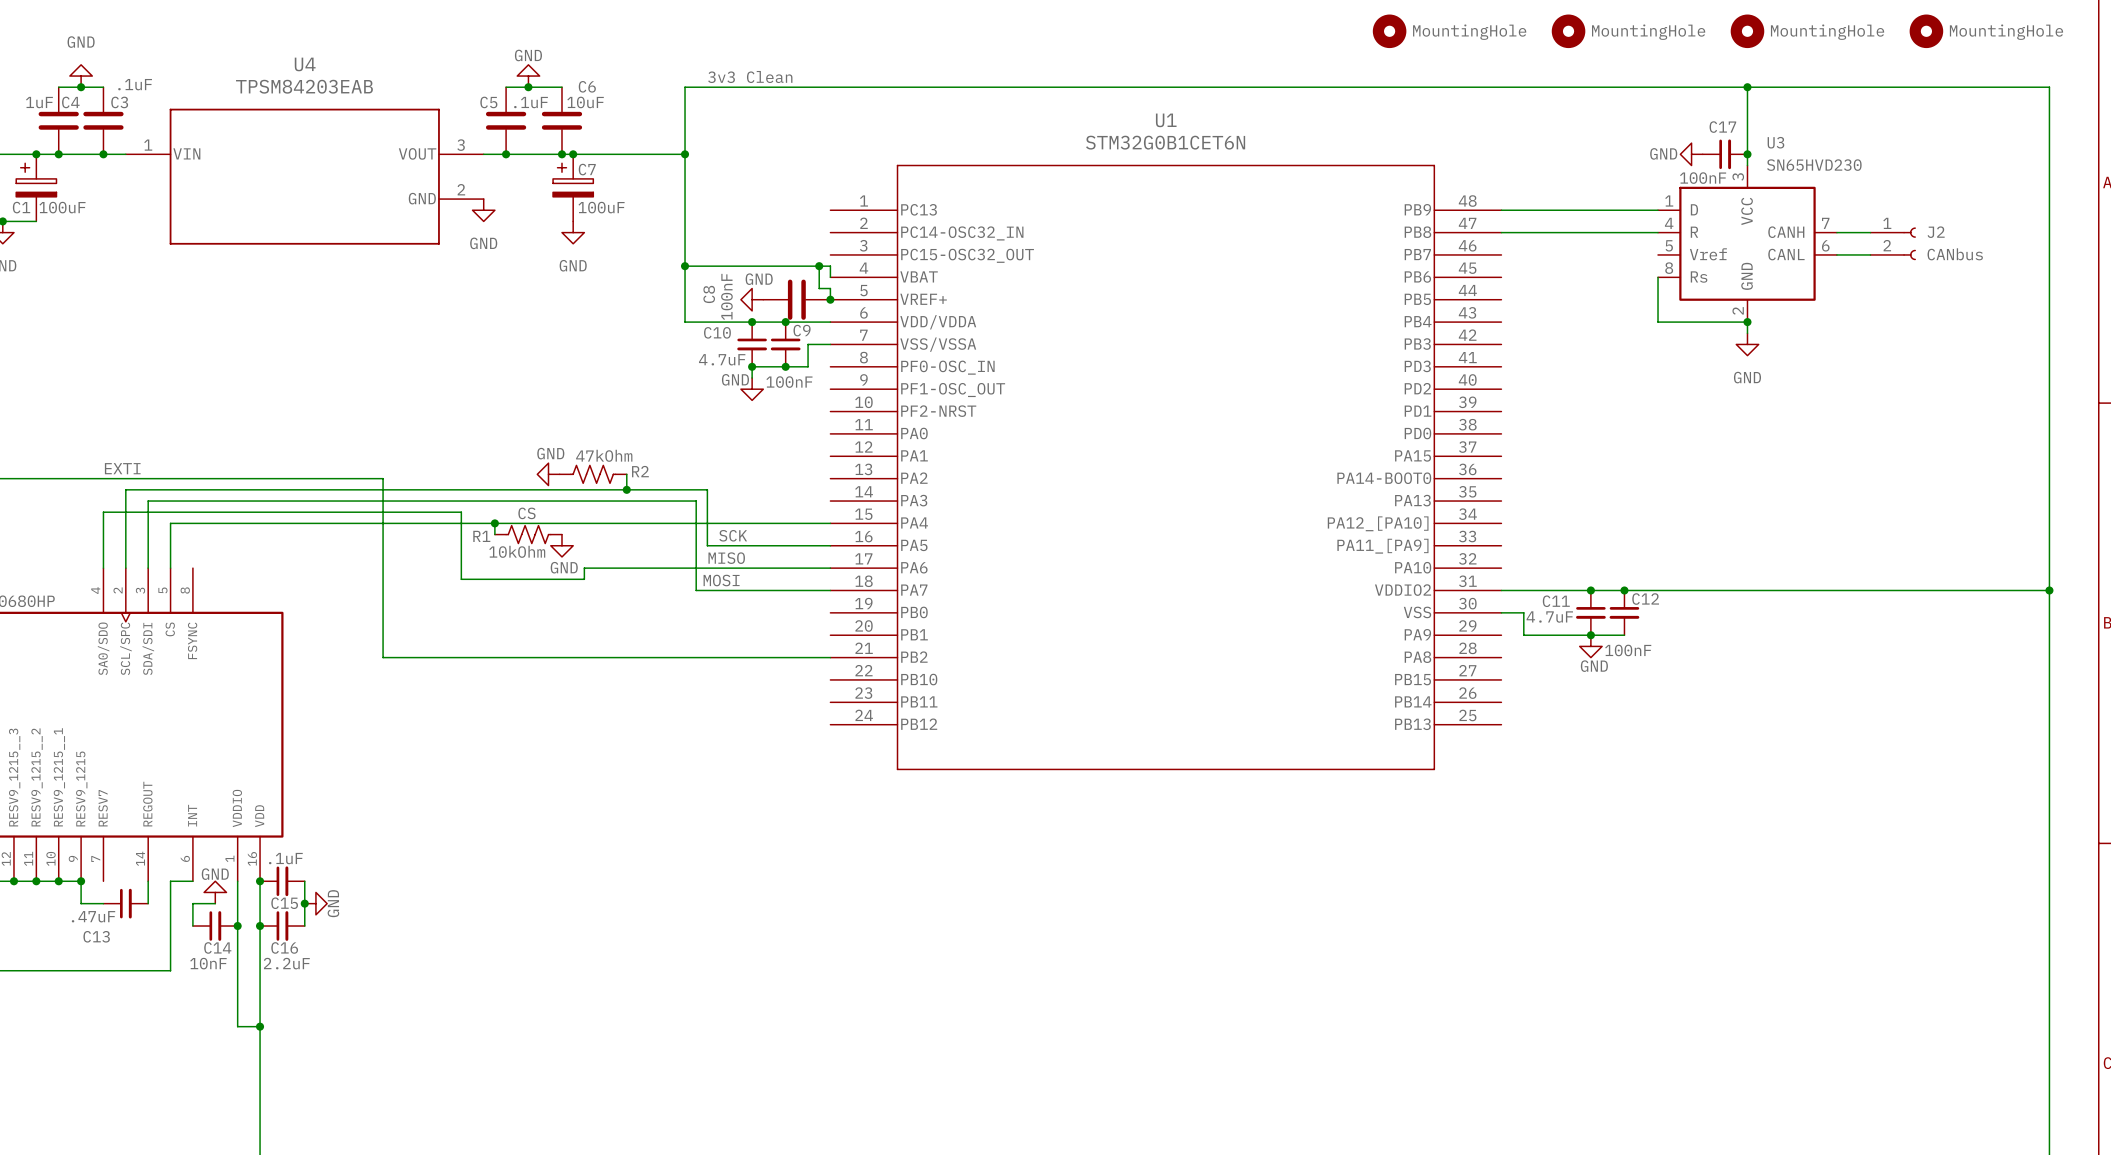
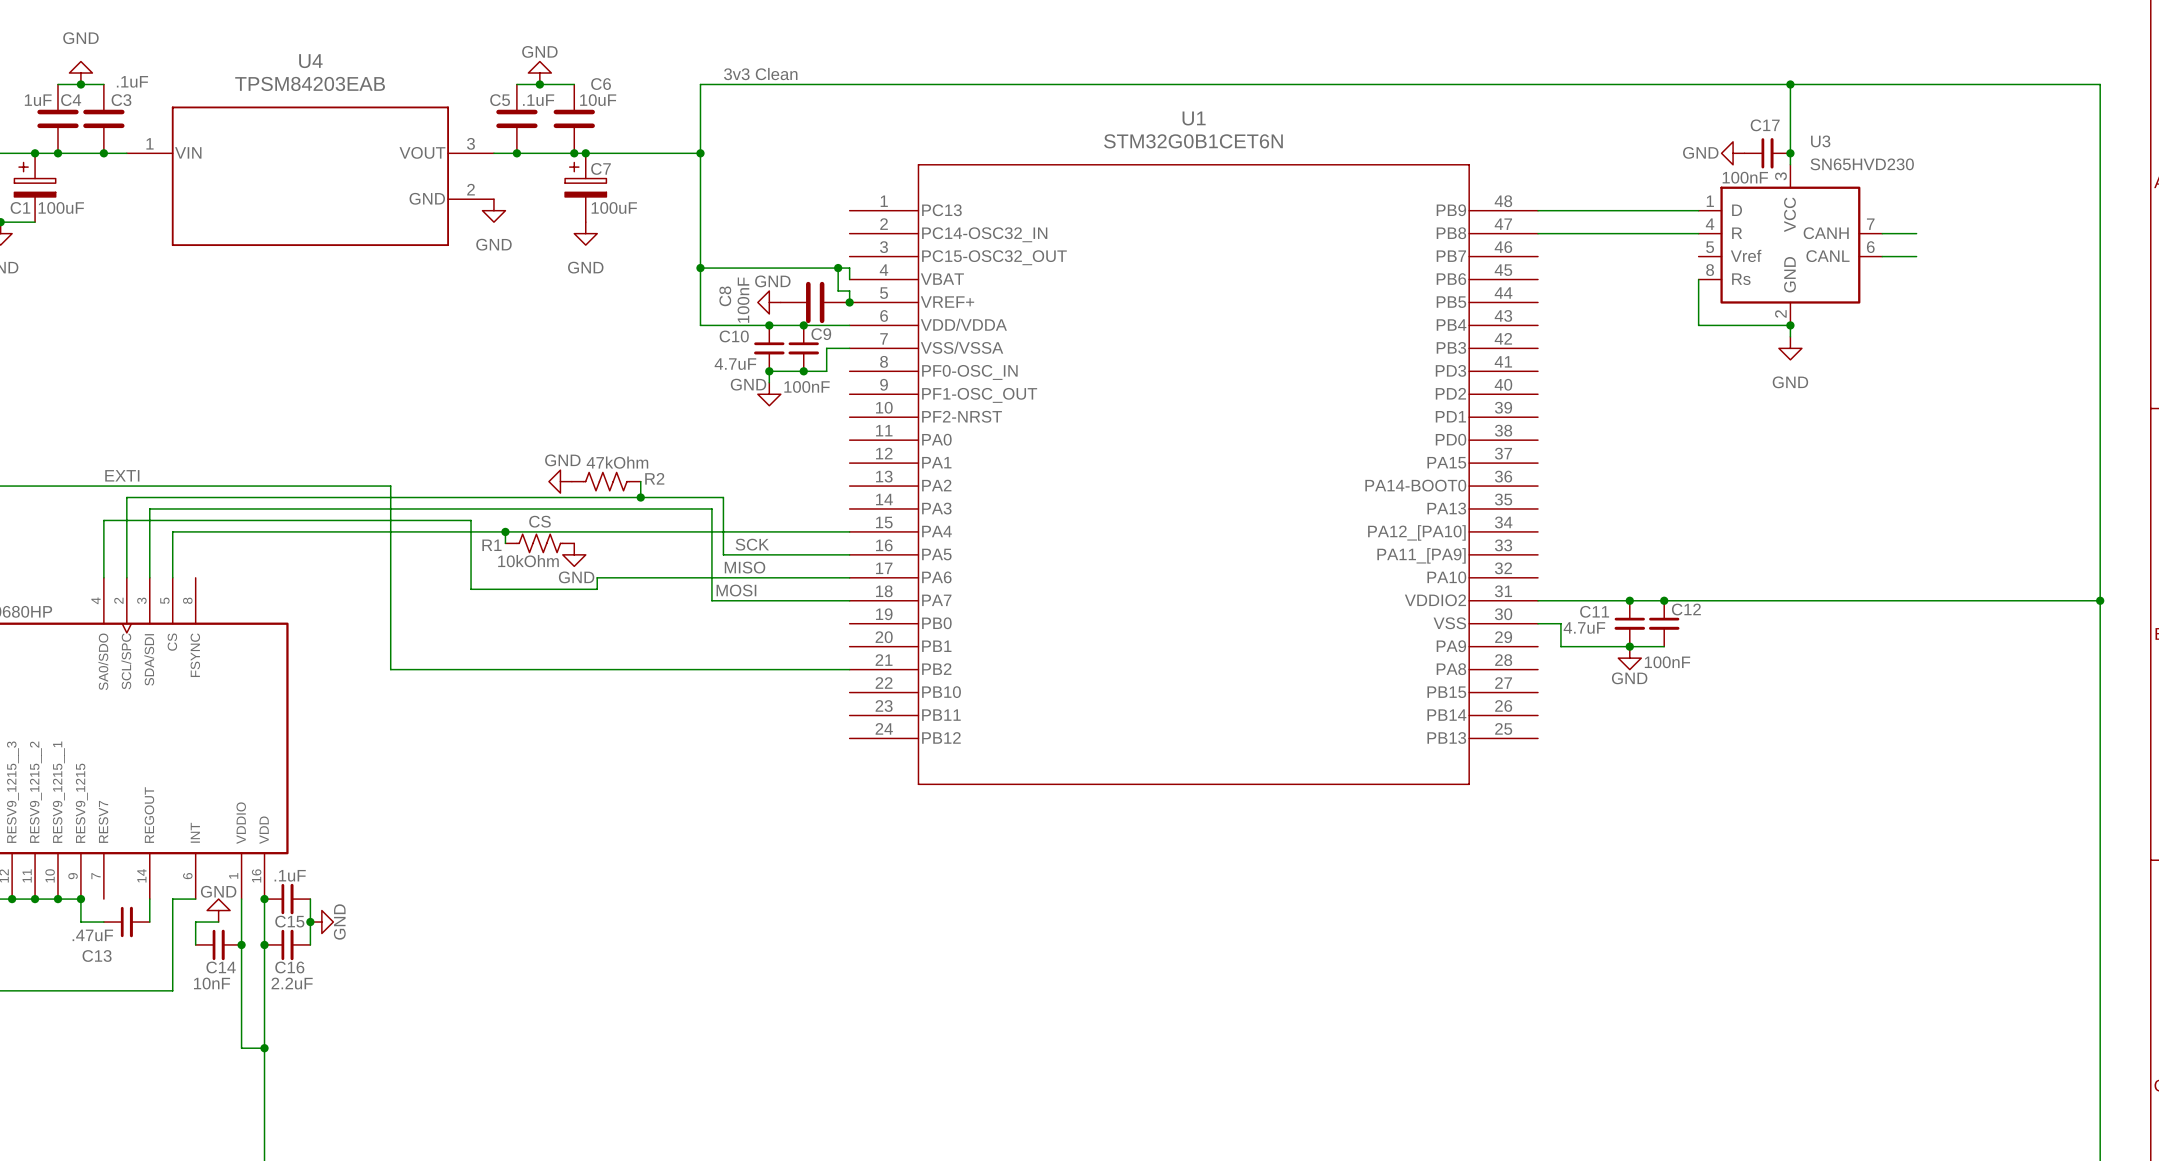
part: MountingHole (1389, 31) -> none
part: MountingHole (1568, 31) -> none
part: MountingHole (1747, 31) -> none
part: MountingHole (1926, 31) -> none
J2: CANbus (1893, 243) -> none

